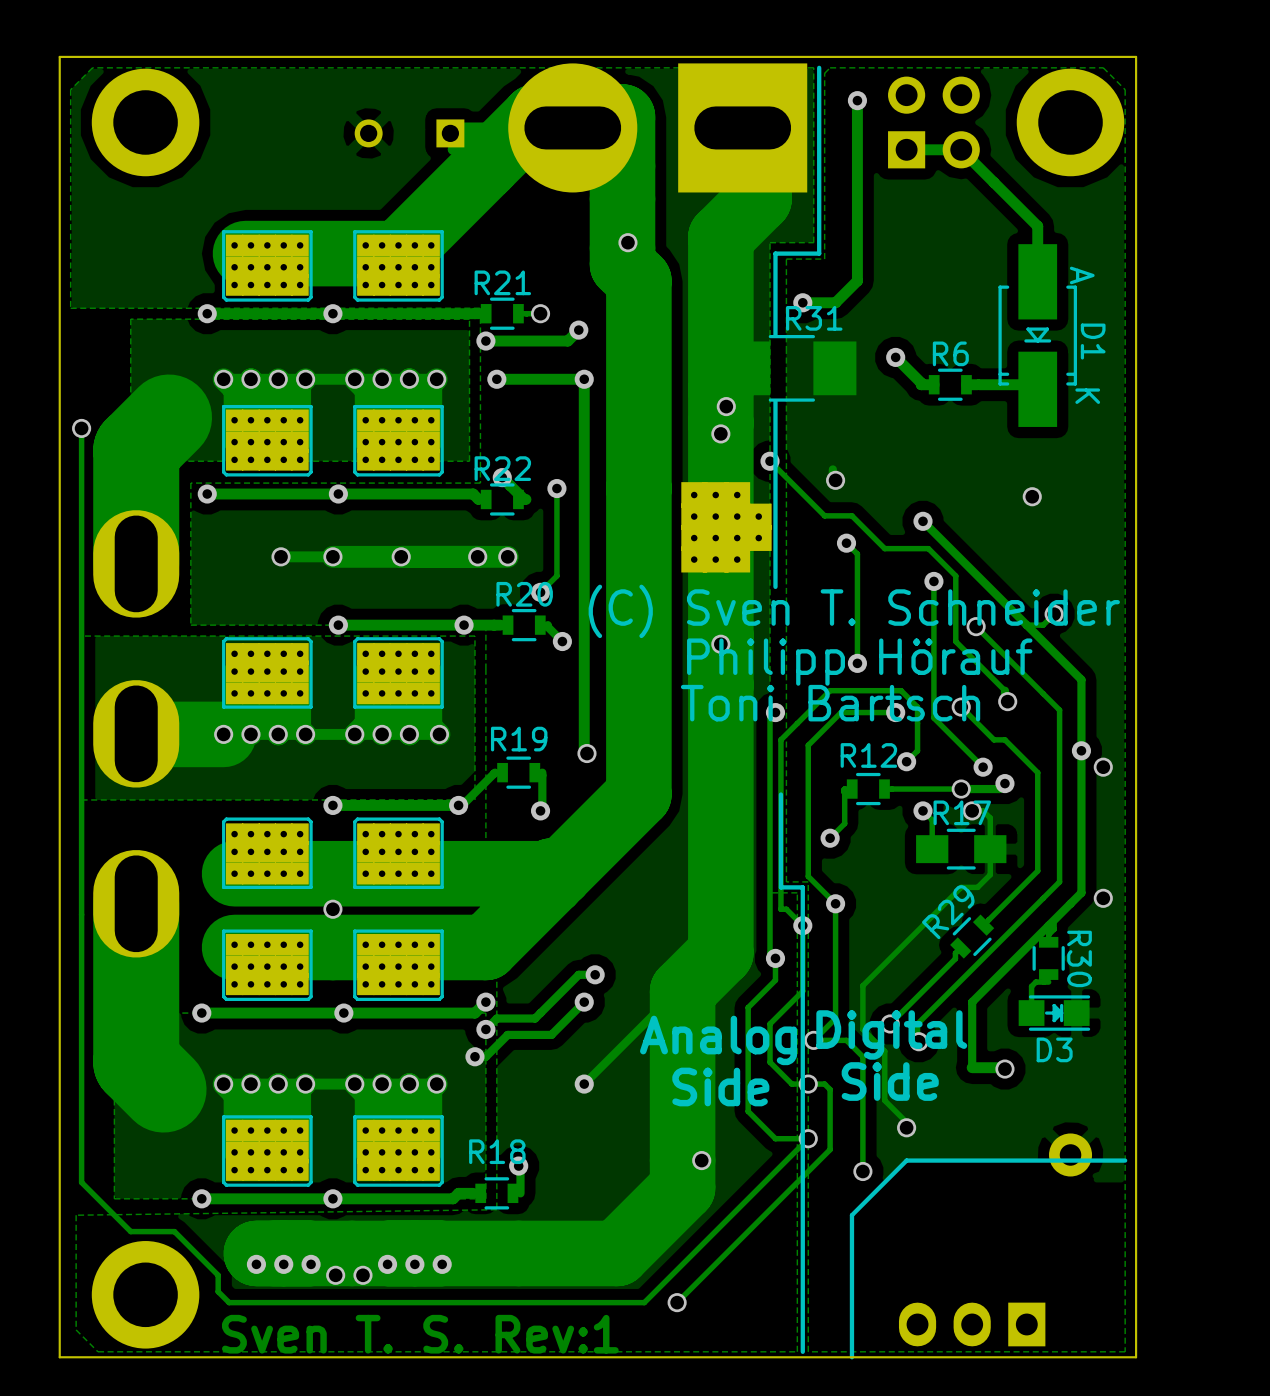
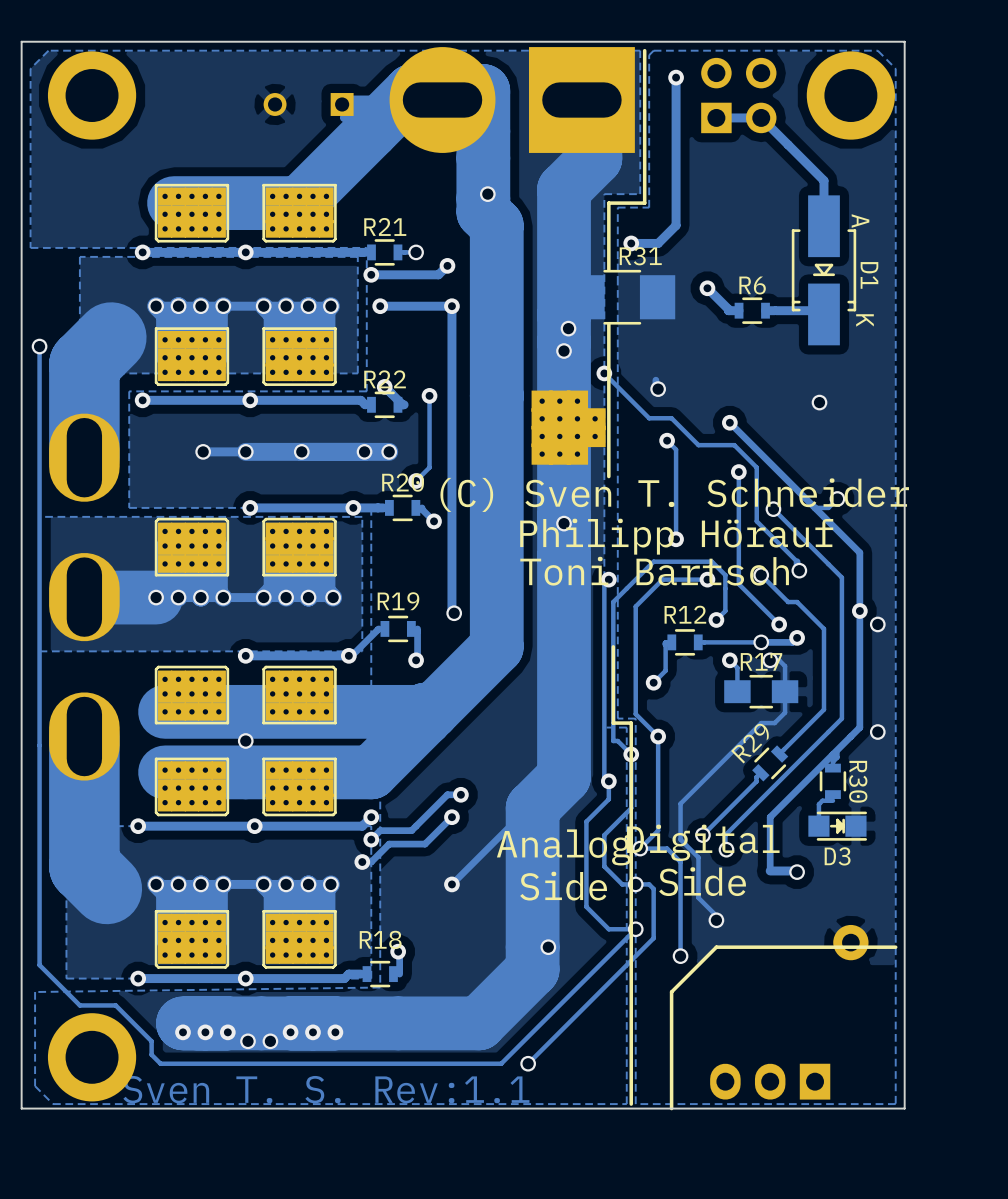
text: Sven T. S. Rev:1 (420, 1334) -> Sven T. S. Rev:1.1 (326, 1089)

